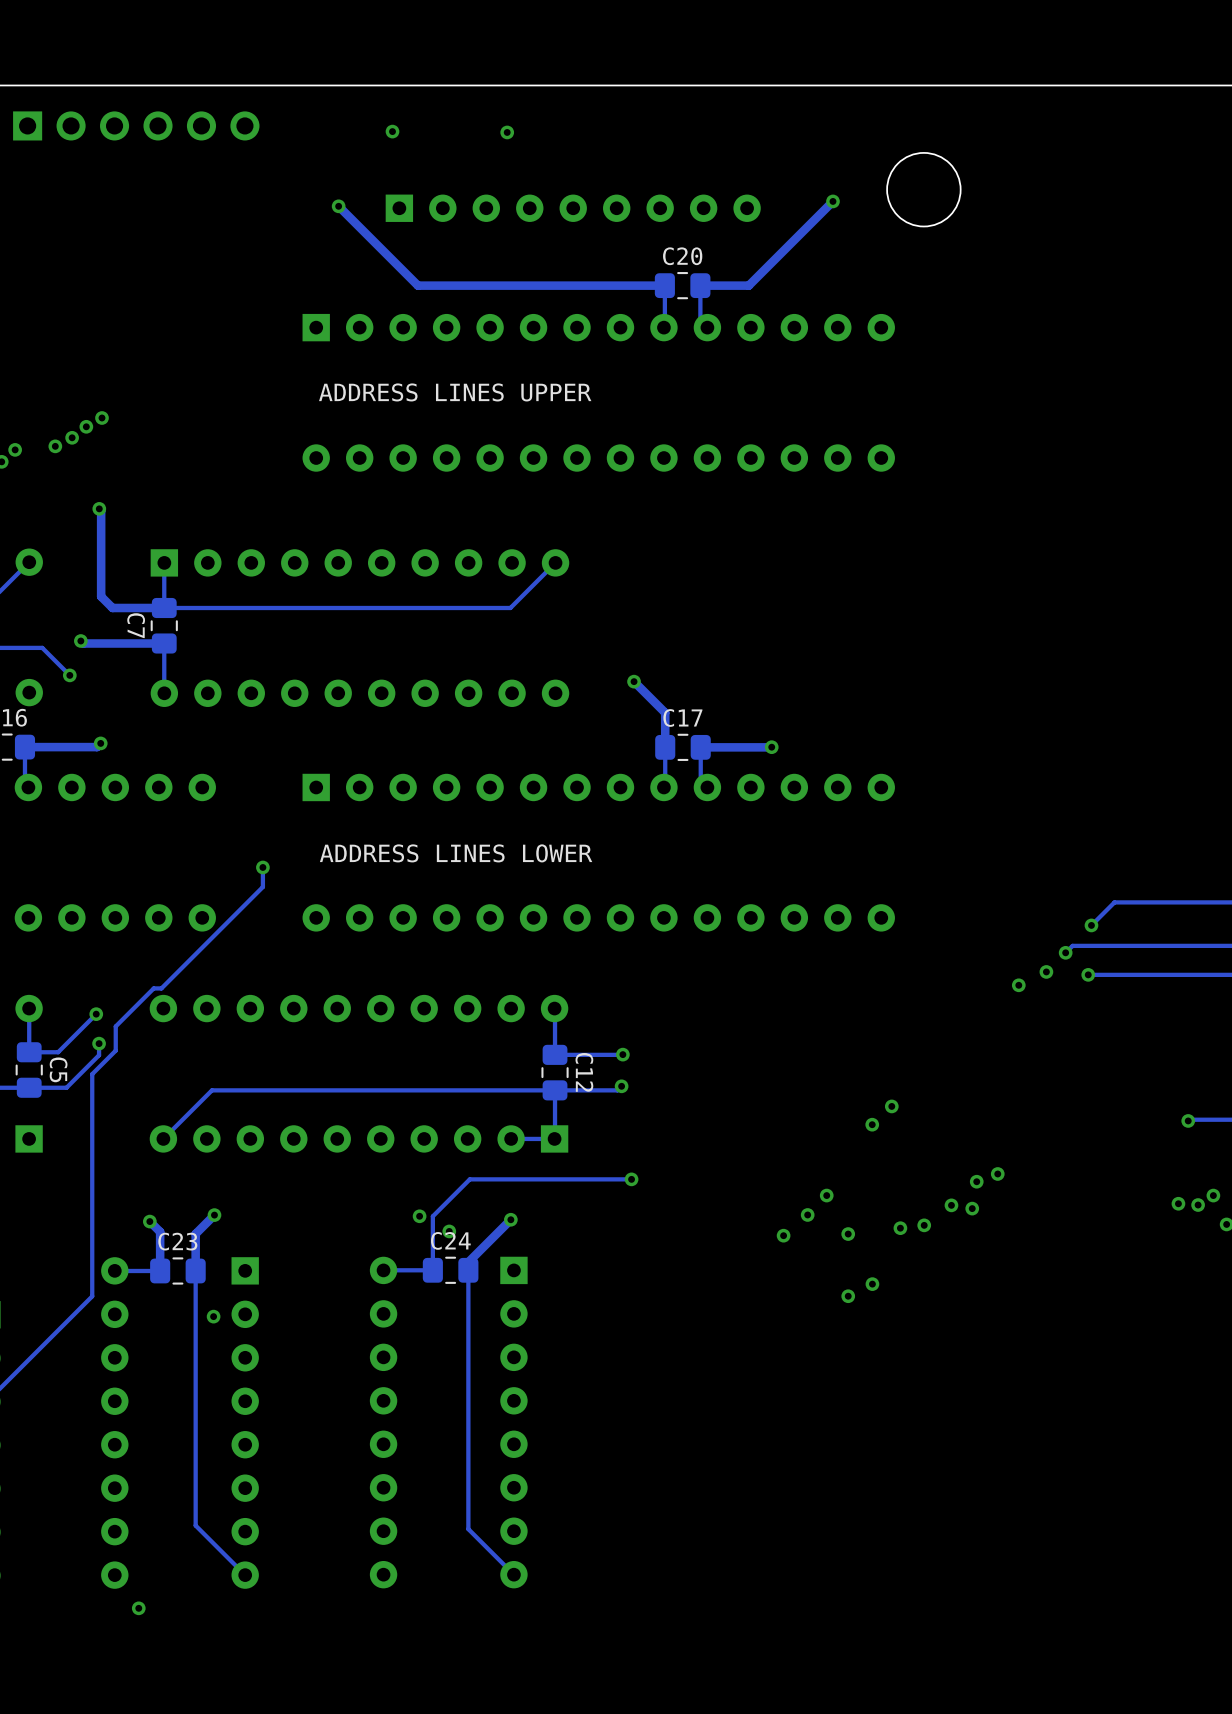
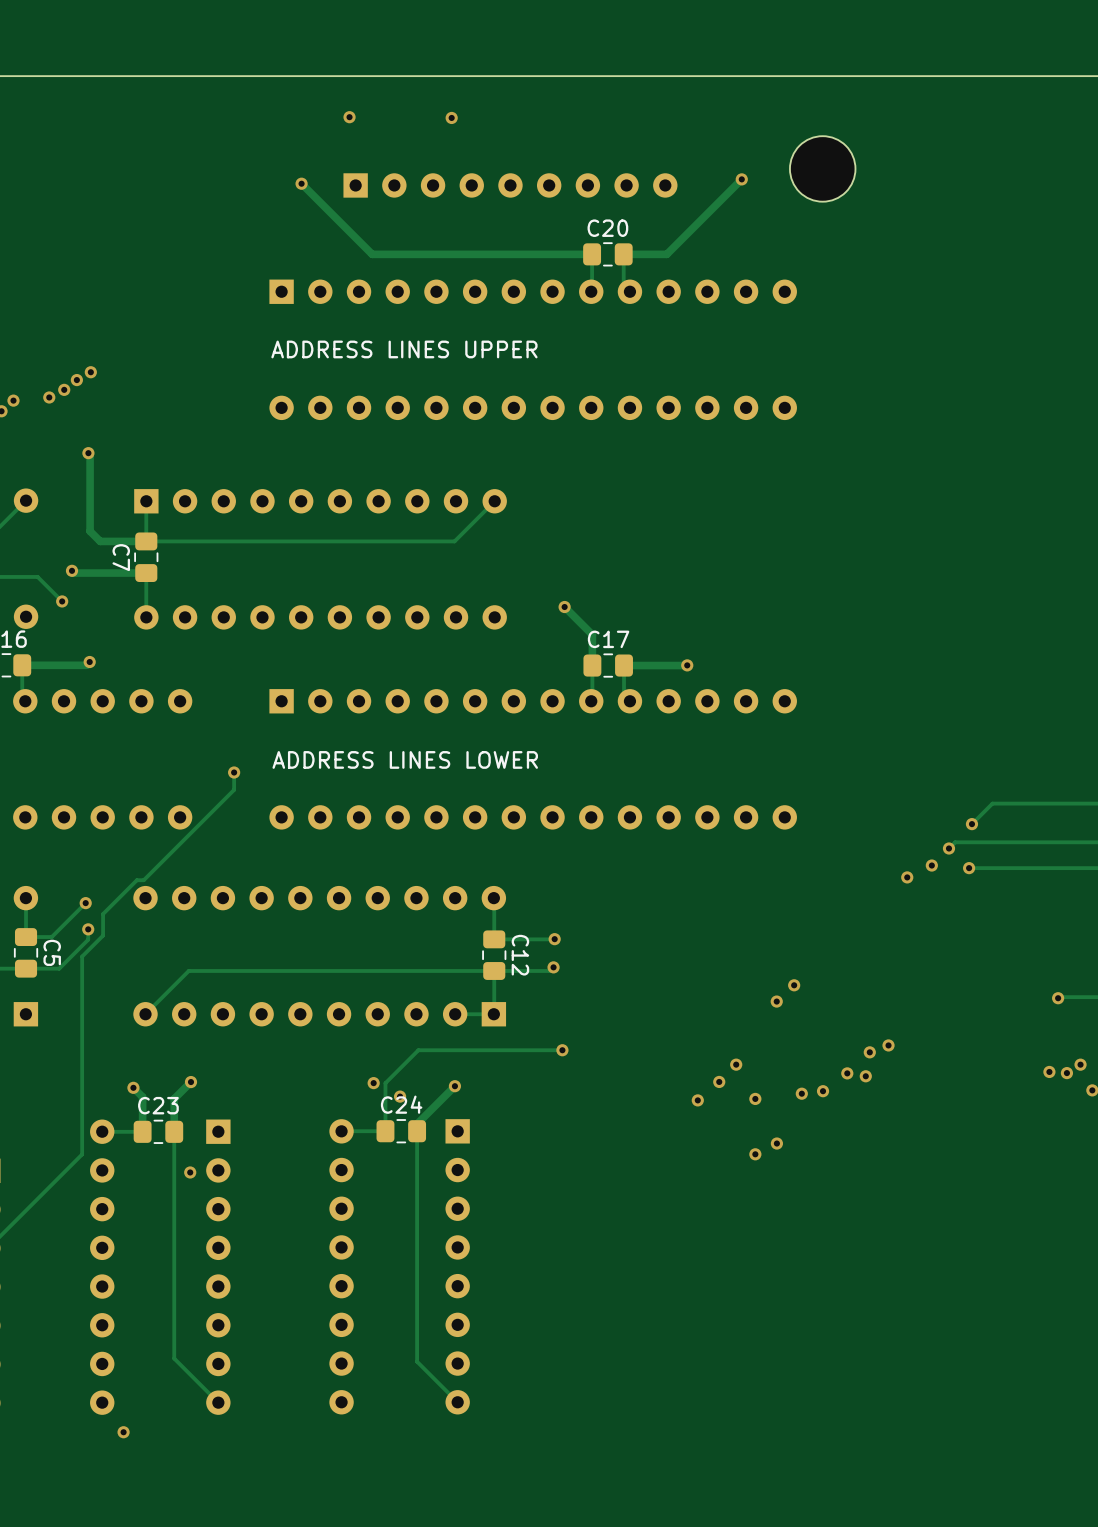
part: (136, 125) -> none

